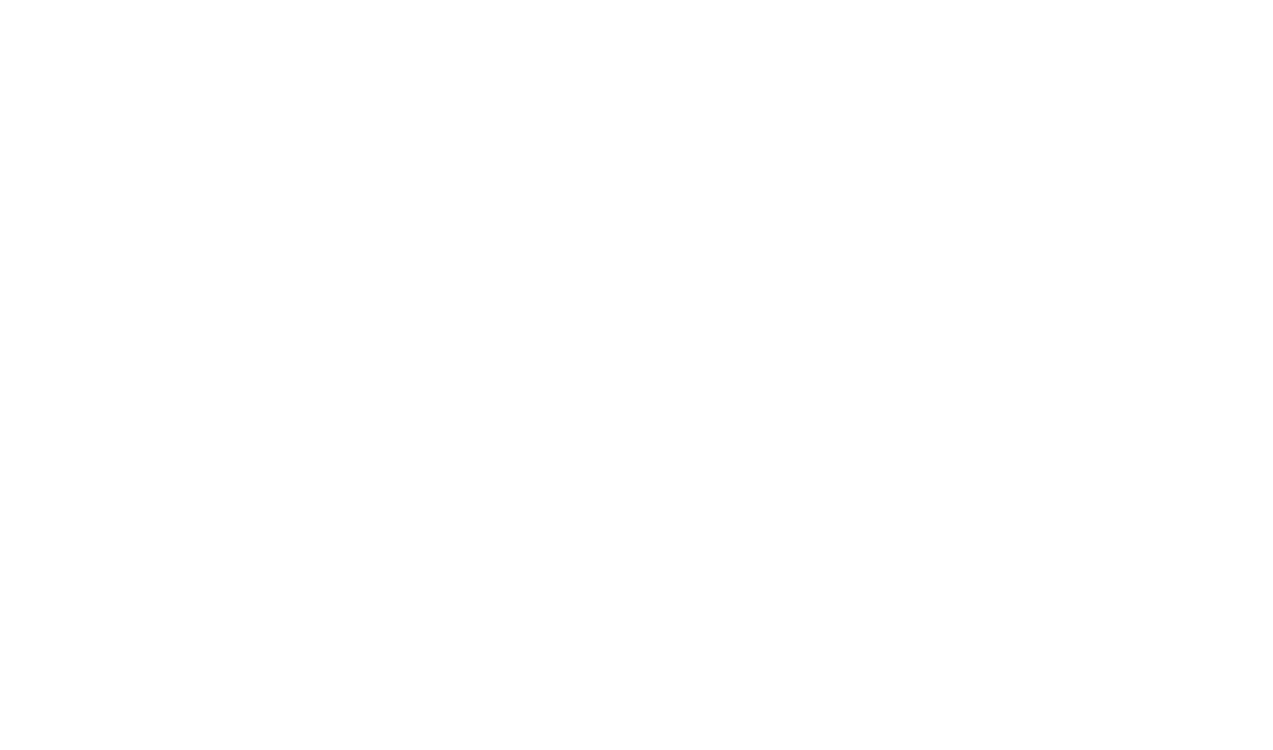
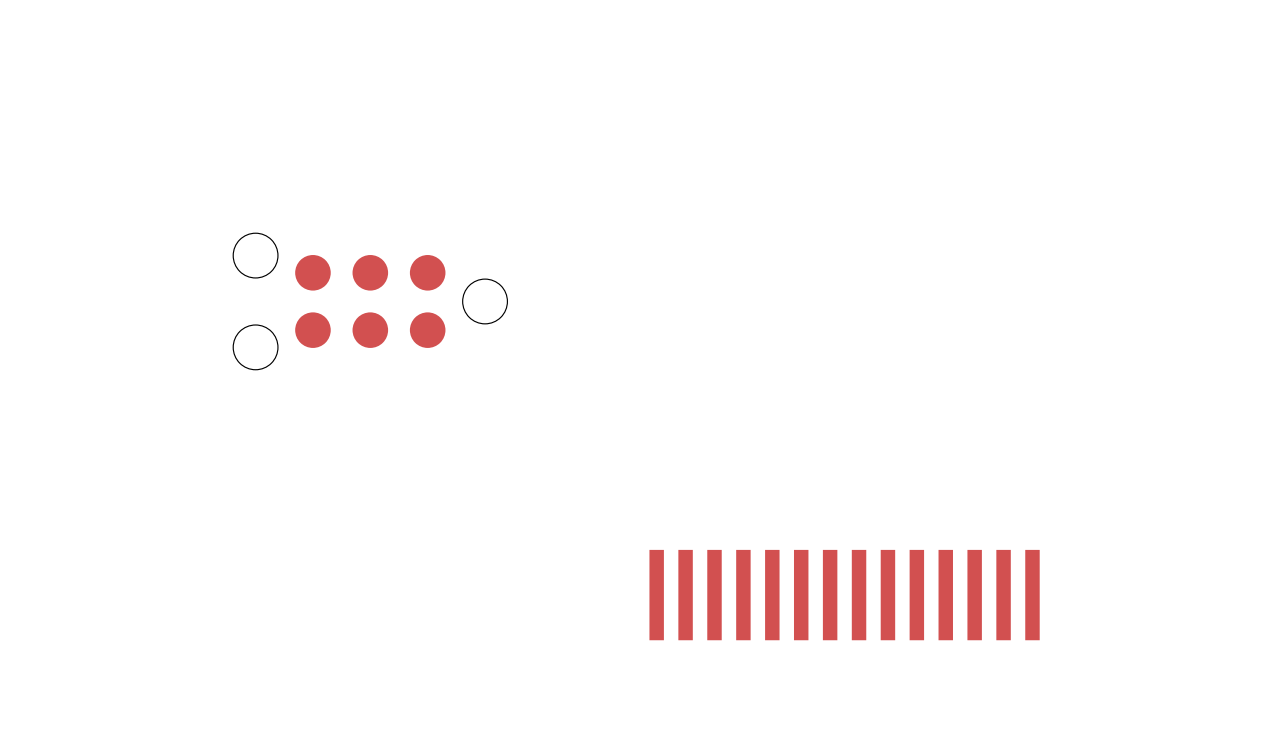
part: none -> (370, 301)
part: none -> (844, 595)

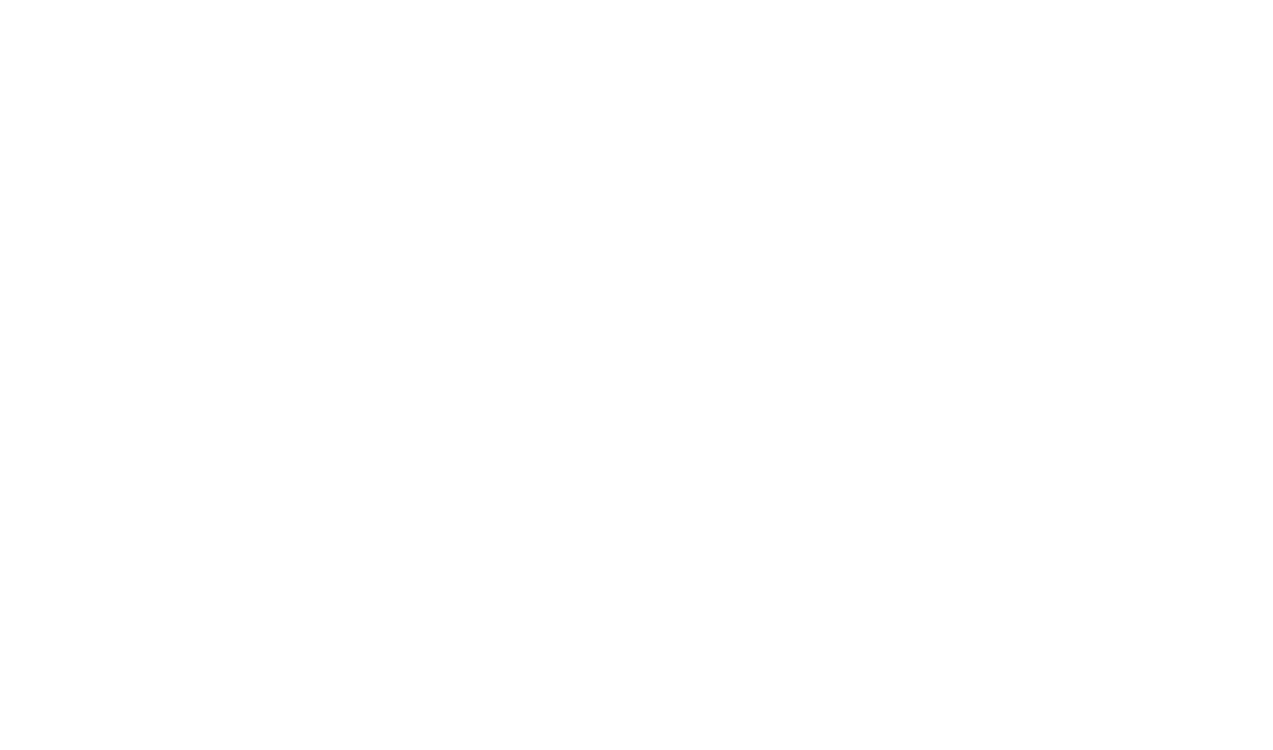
part: (370, 301) -> none
part: (844, 595) -> none

